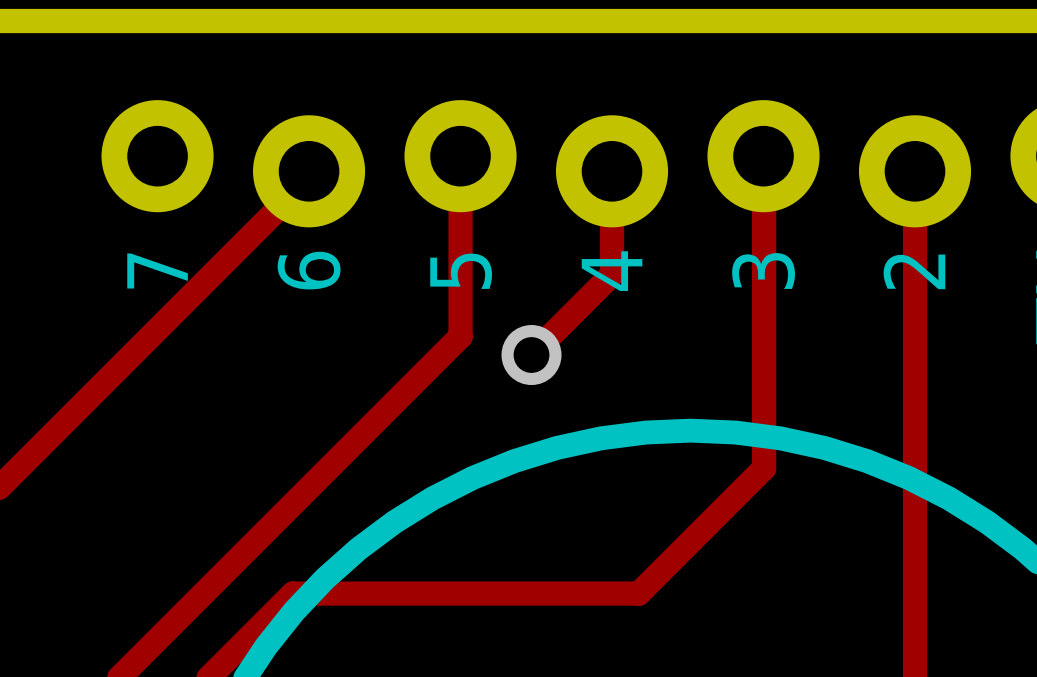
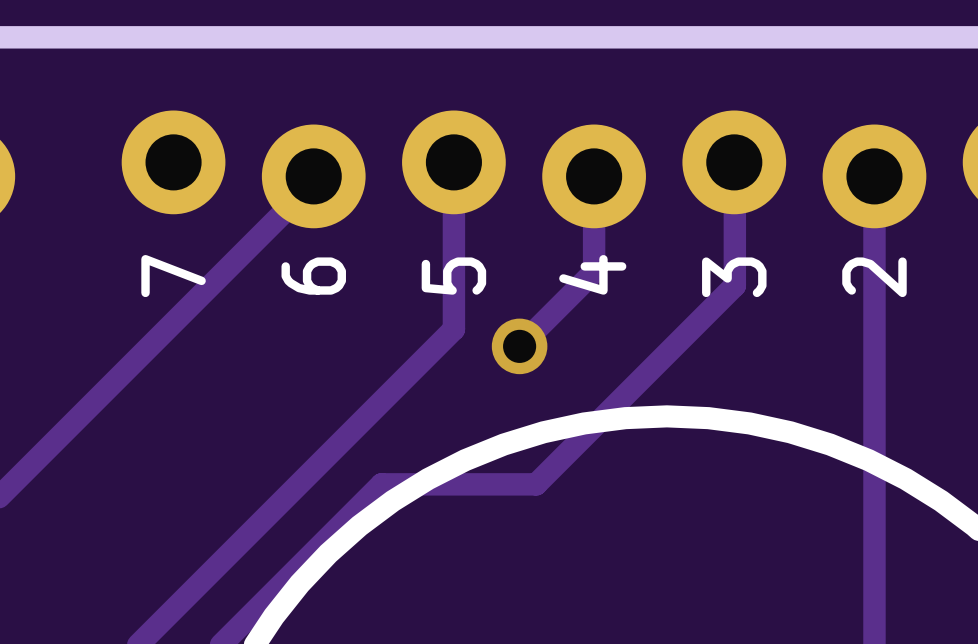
track: (764, 289) (764, 468) (638, 593) (292, 593) -> (734, 285) (536, 484) (381, 484) (298, 567)

